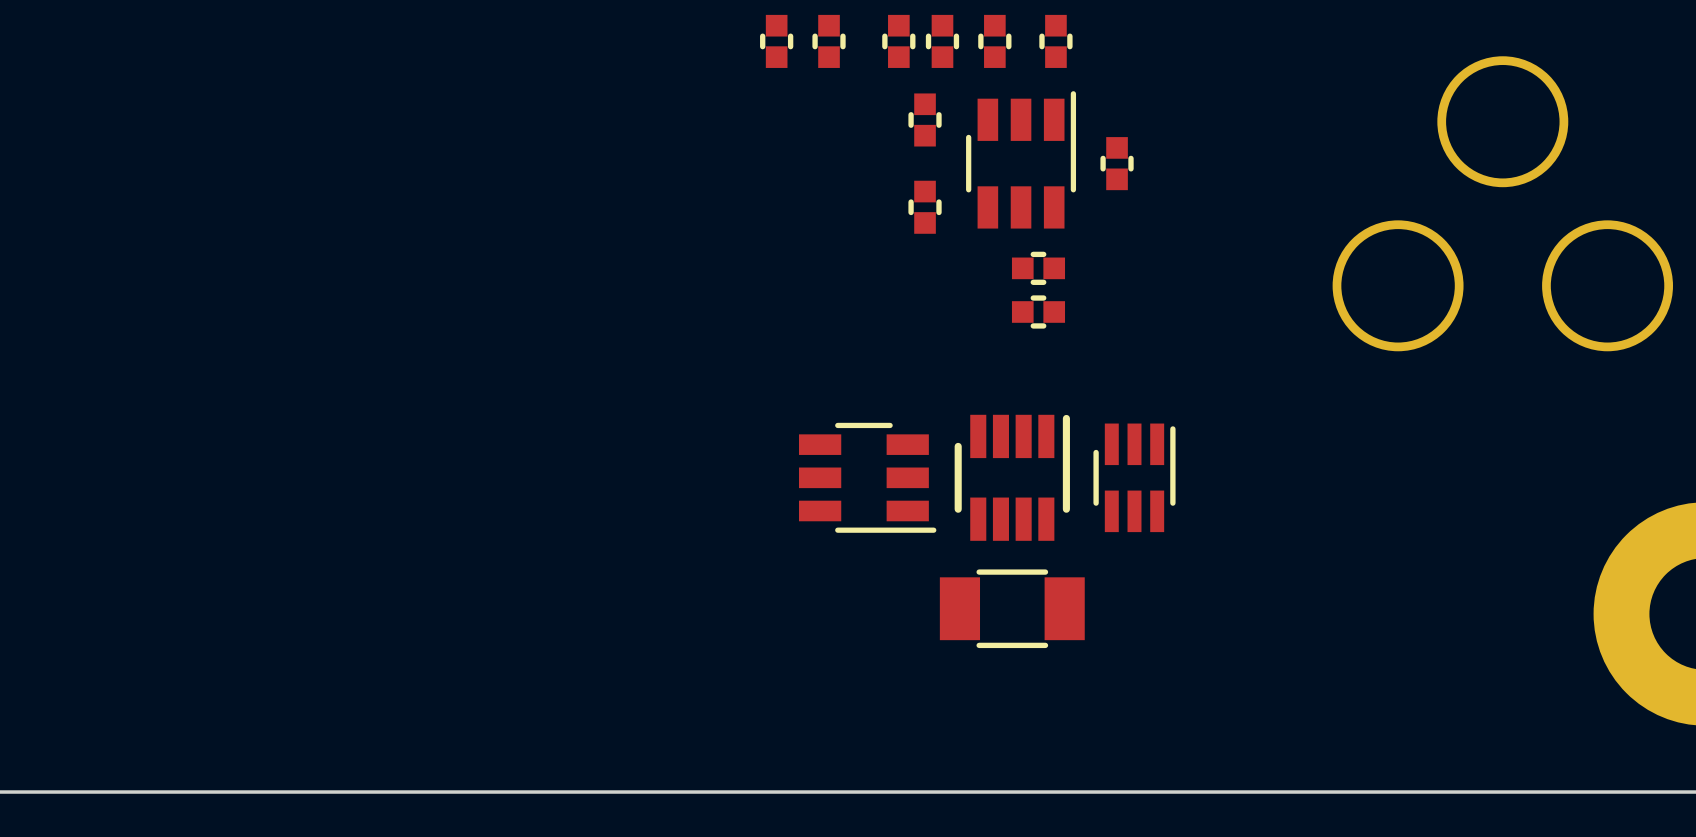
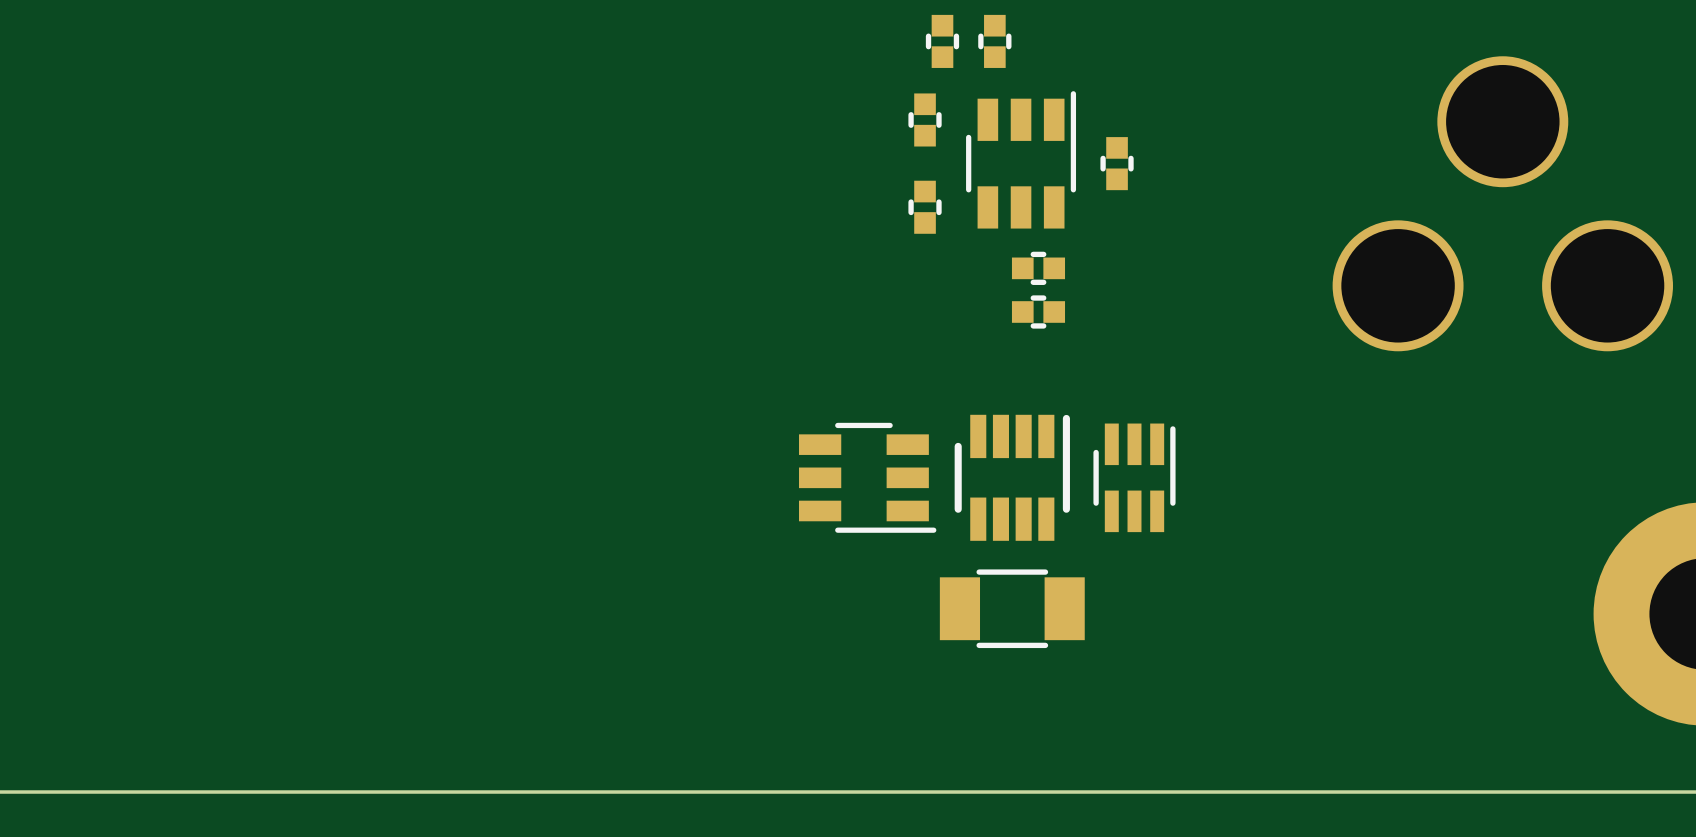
part: (776, 41) -> none
part: (829, 41) -> none
part: (898, 41) -> none
part: (1055, 41) -> none

